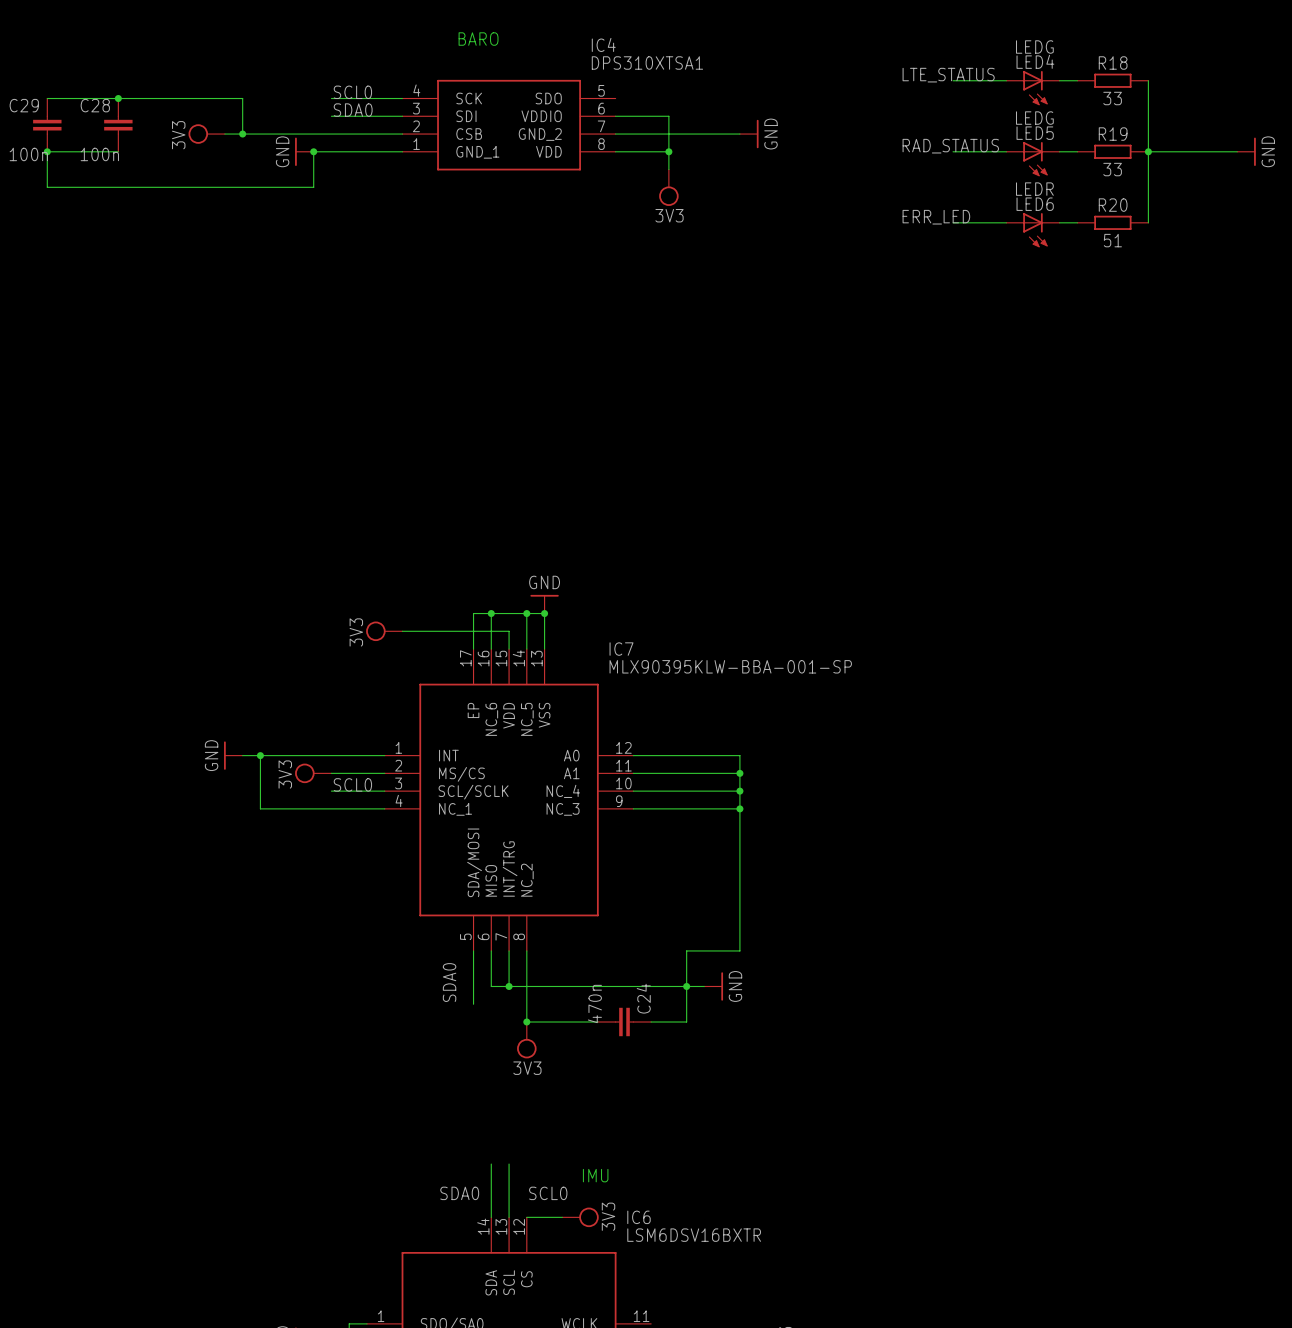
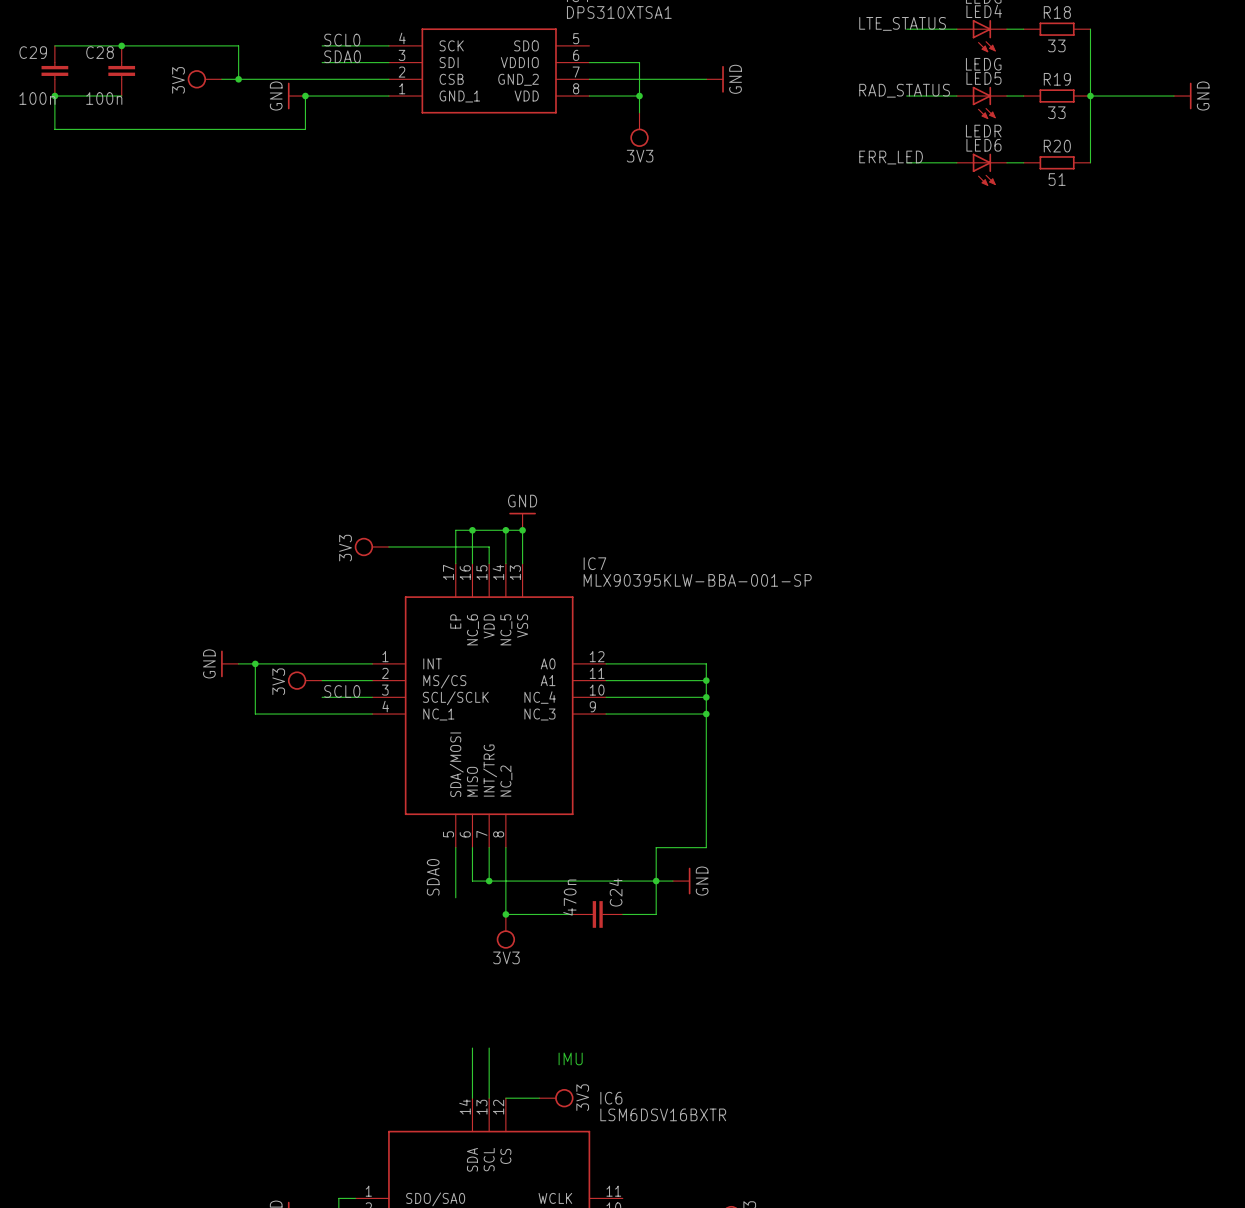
label: SDA0 (459, 1193) -> none
label: SCL0 (548, 1193) -> none

